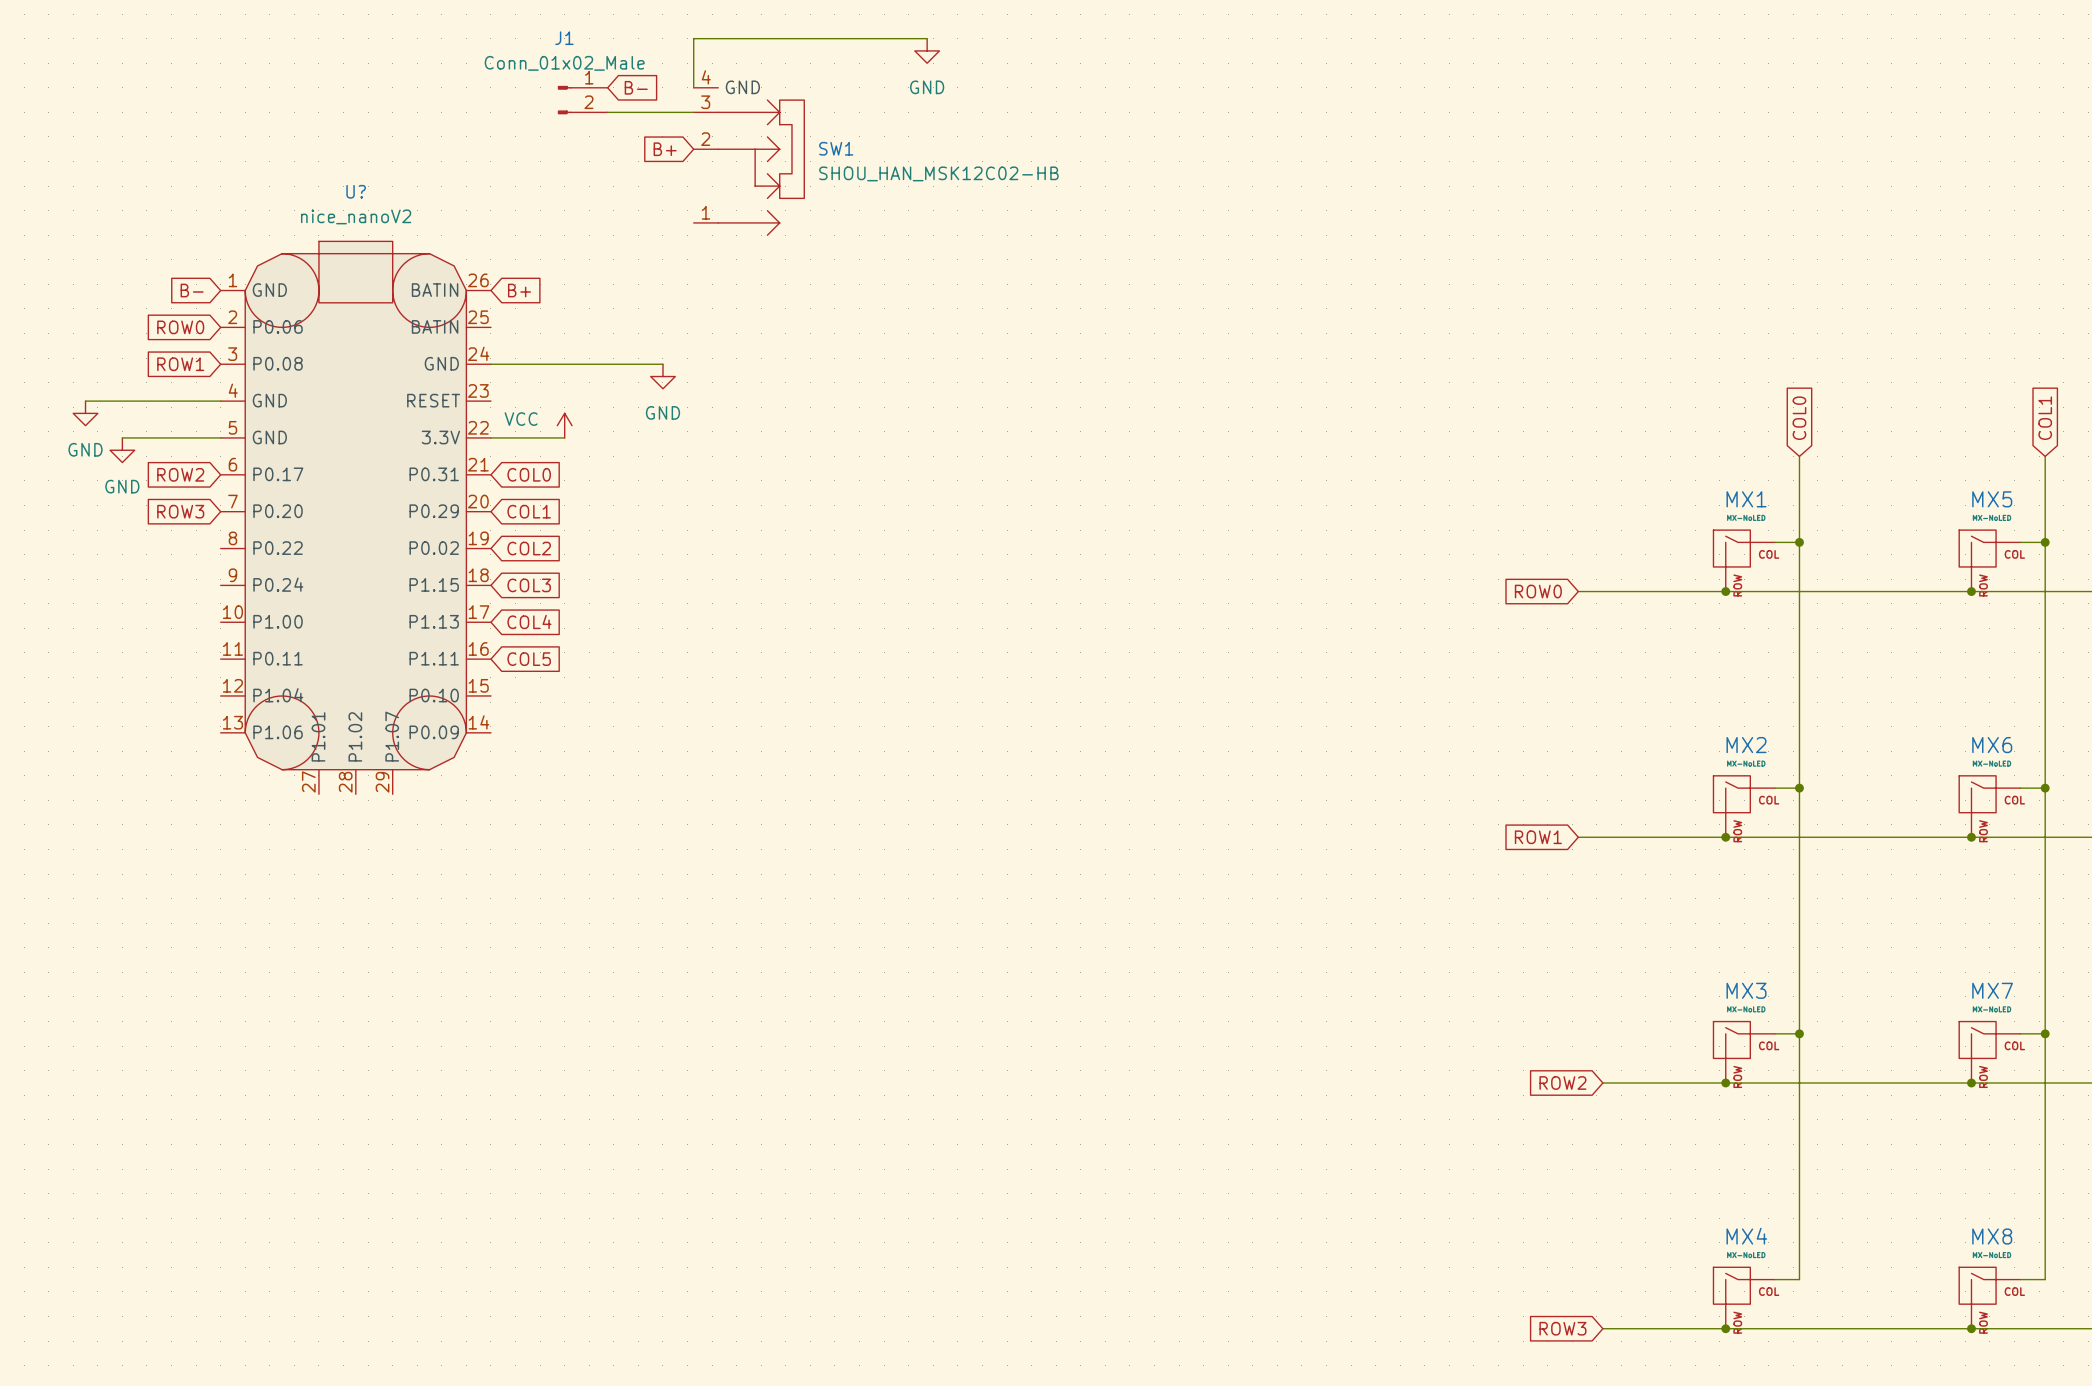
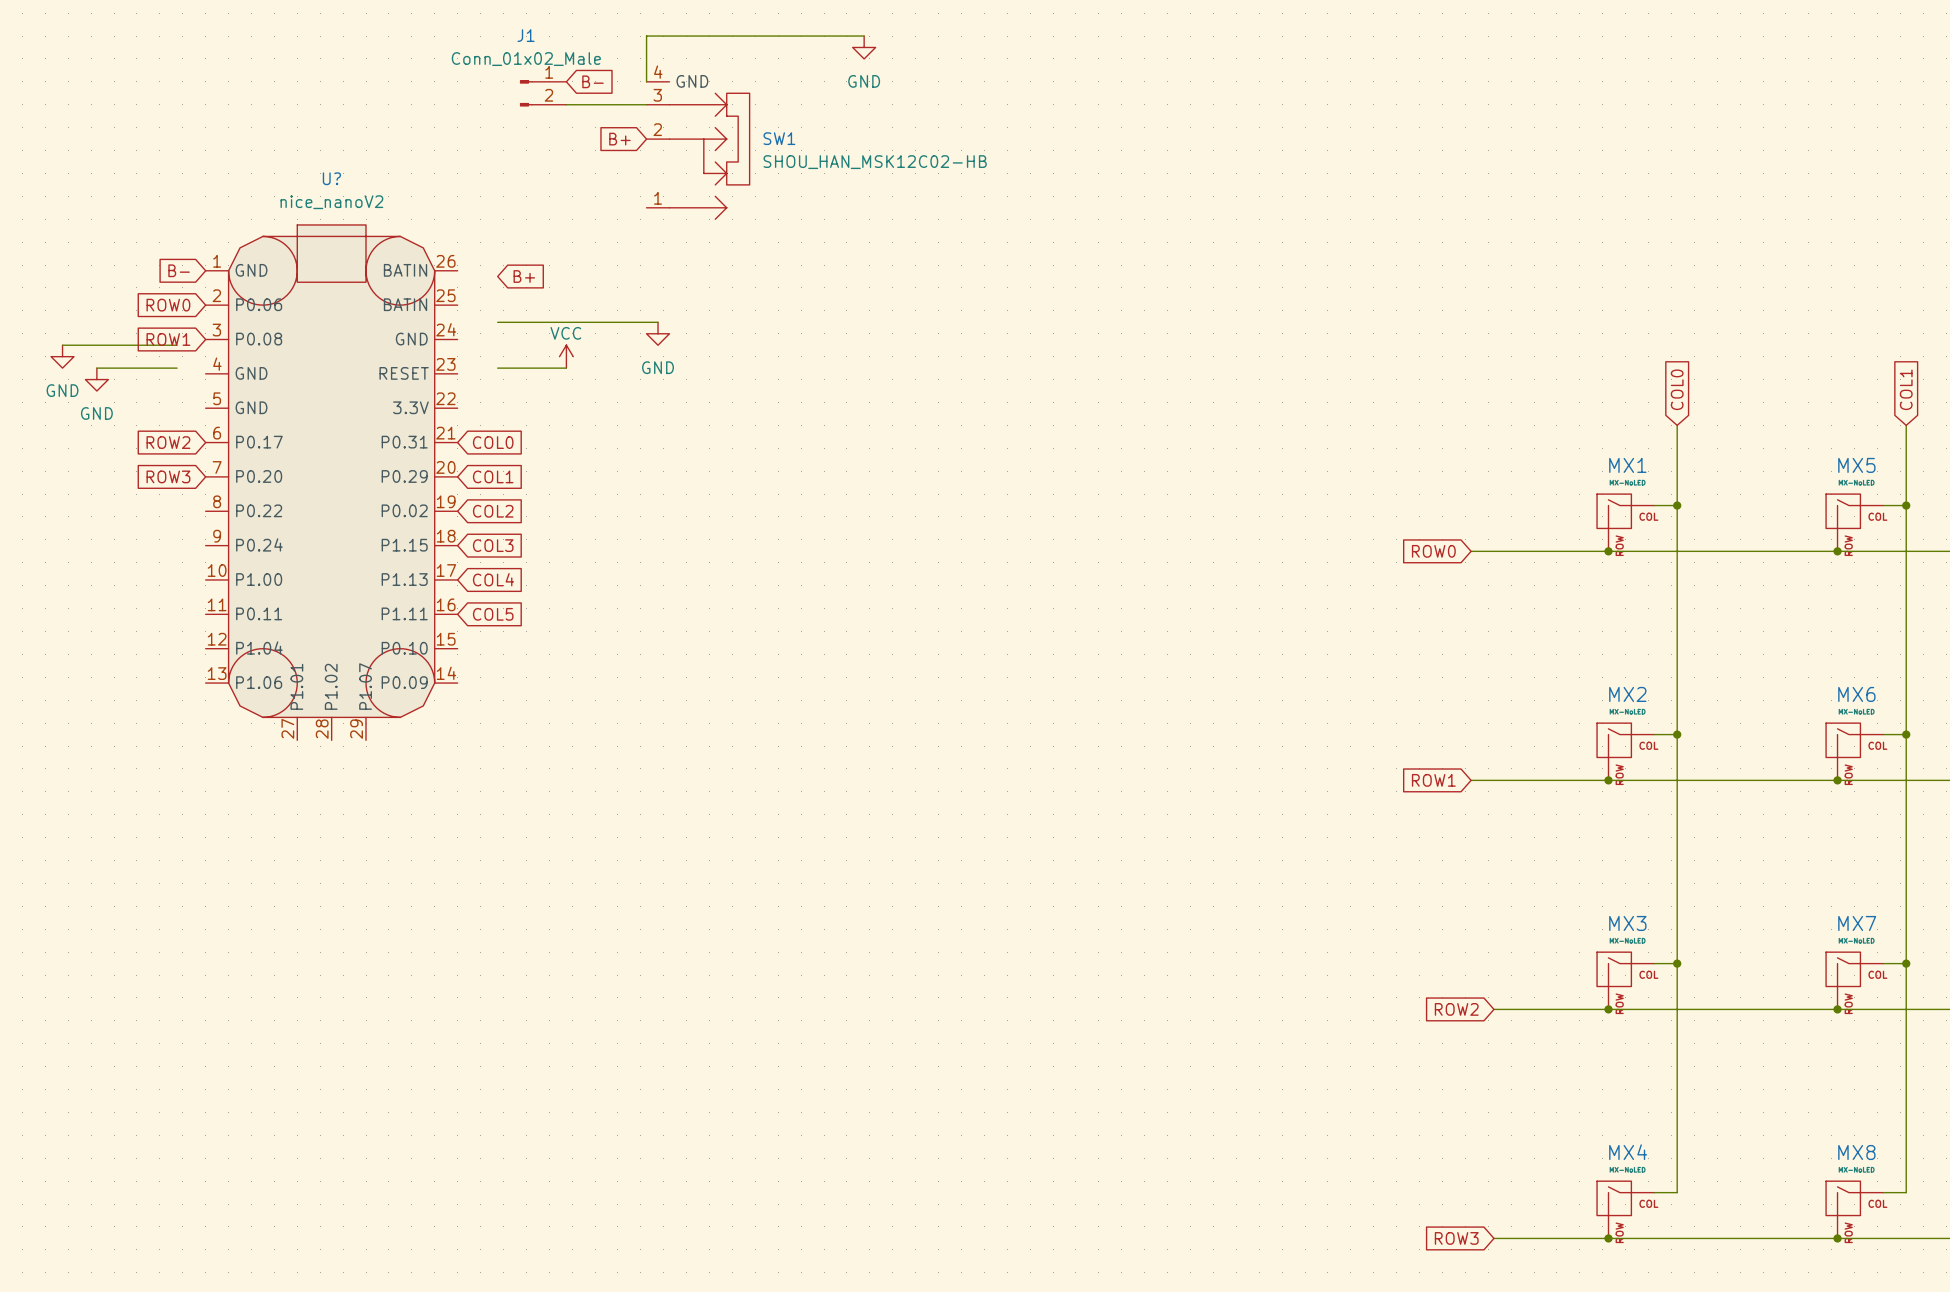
global label position: B+ (519, 290) -> B+ (524, 276)
wire: (490, 364) (662, 364) -> (497, 322) (658, 322)
wire: none -> (62, 345) (177, 345)
power symbol position: GND (662, 376) -> GND (658, 333)
power symbol: none -> GND (62, 356)
wire: none -> (96, 368) (177, 368)
wire: (85, 401) (220, 401) -> none
power symbol: none -> GND (96, 379)
power symbol: GND (85, 413) -> none
power symbol text position: VCC (521, 419) -> VCC (565, 333)
power symbol position: VCC (564, 425) -> VCC (566, 356)
wire: (122, 437) (220, 437) -> none
wire: (490, 437) (564, 437) -> (497, 368) (566, 368)
power symbol: GND (122, 450) -> none

